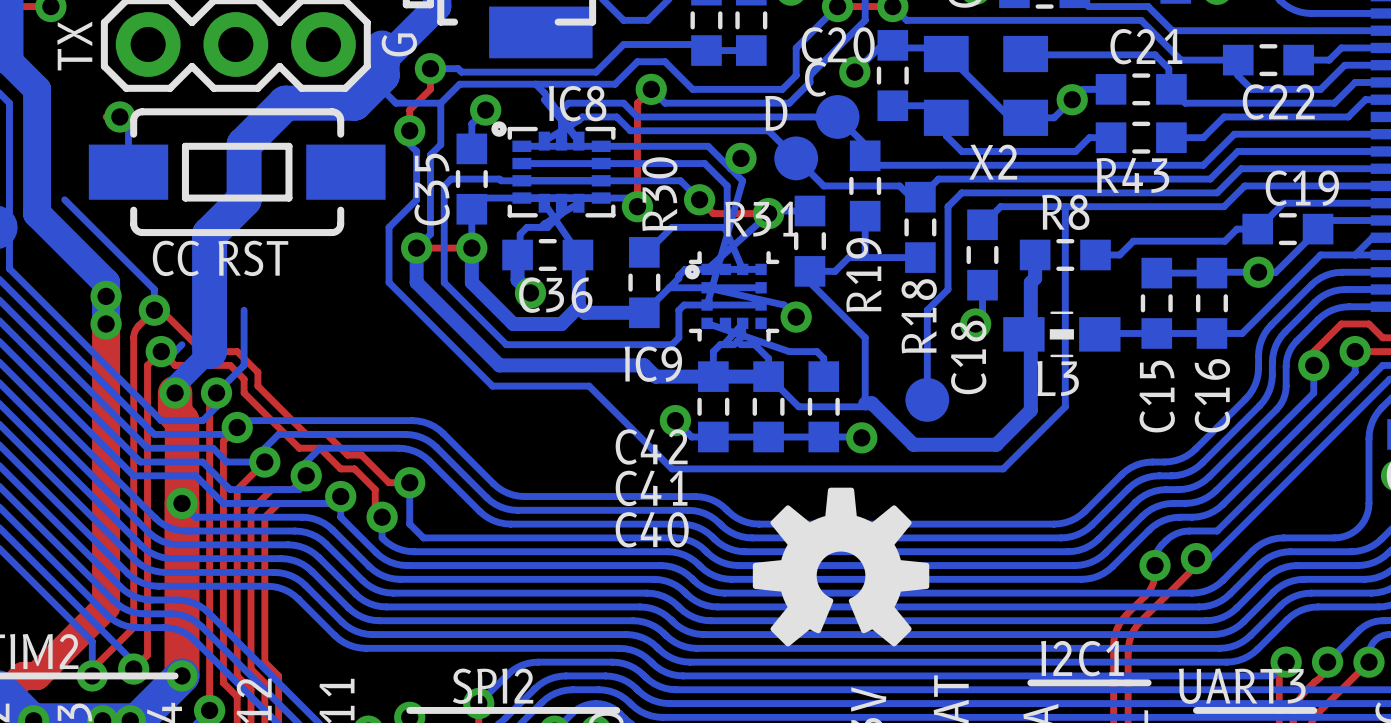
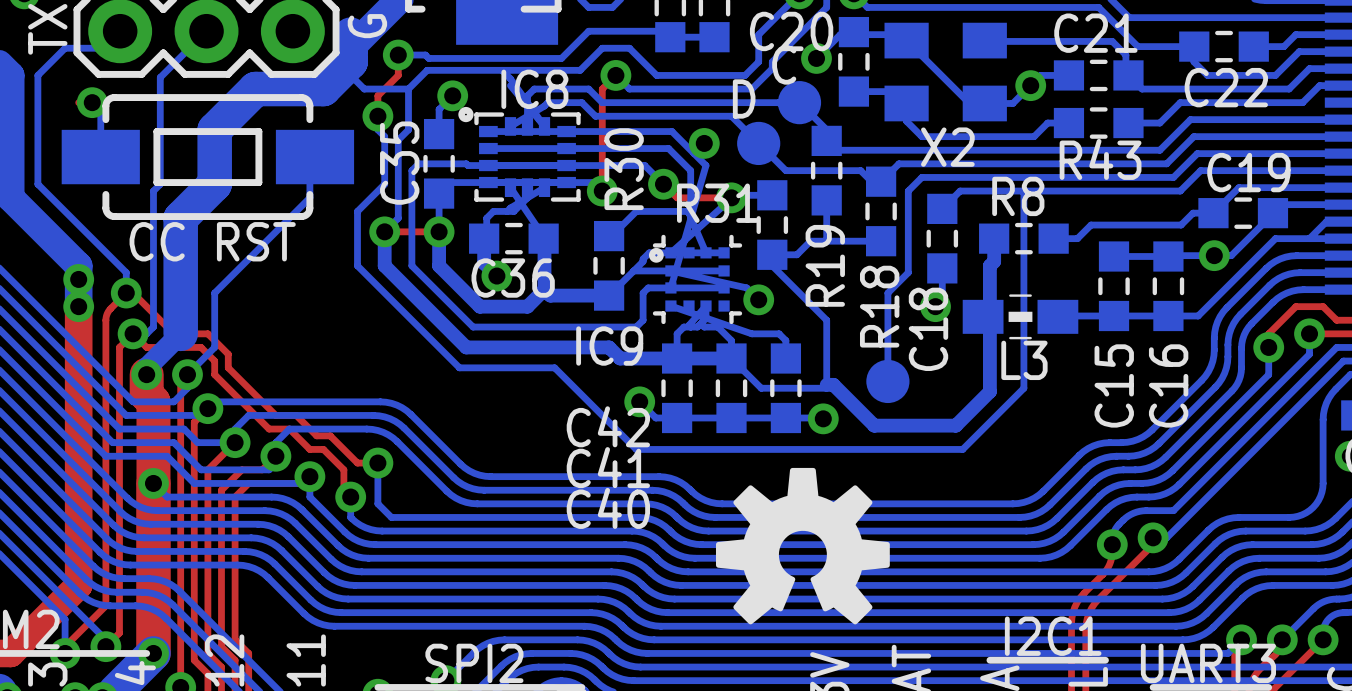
bottom track: none -> (120, 31) (103, 48) (65, 48) (37, 75) (37, 184)
bottom track: none -> (206, 31) (160, 77) (160, 184) (153, 191) (153, 327)
bottom track: none -> (309, 162) (309, 197) (214, 293)

